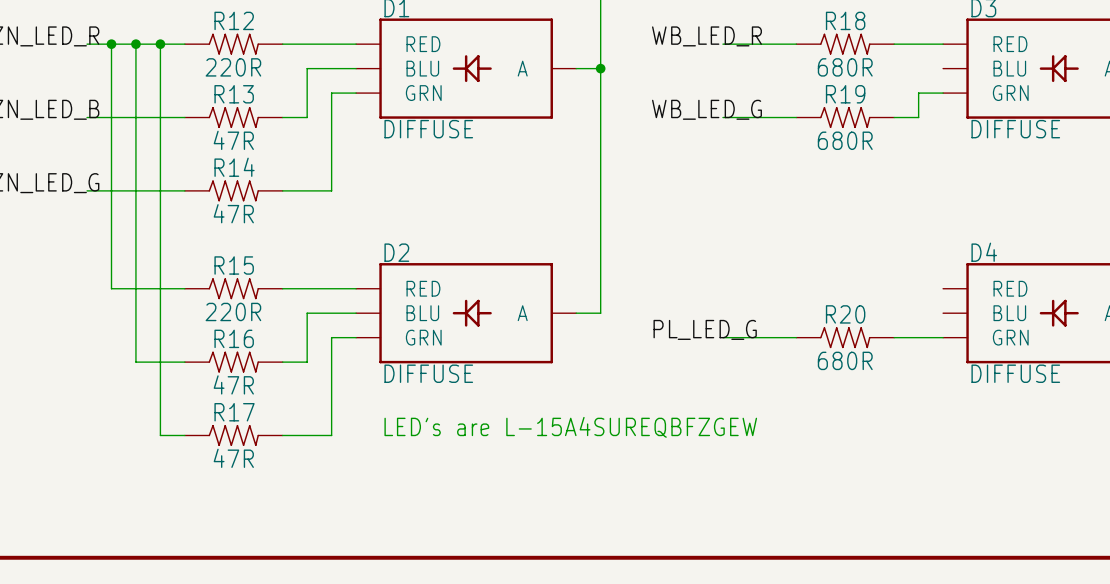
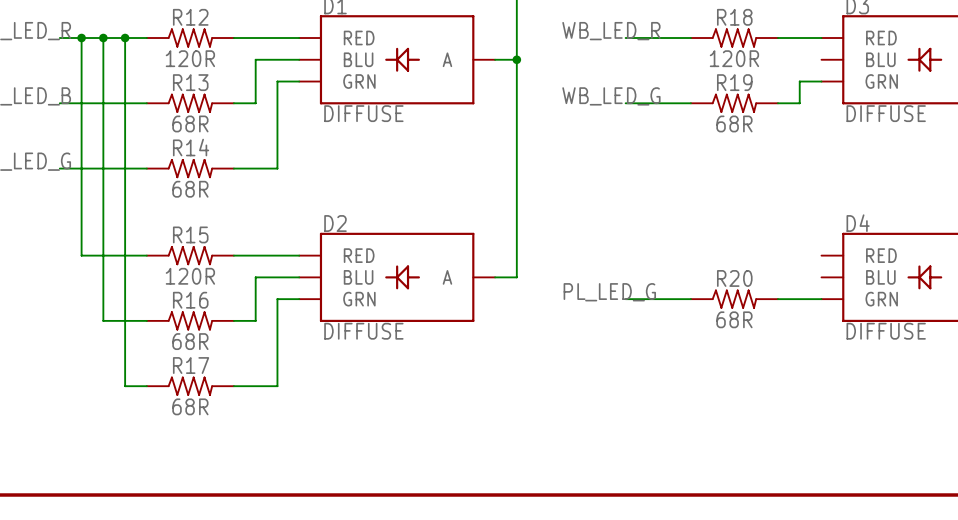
R12 value: 220R (233, 67) -> 120R (190, 58)
R18 value: 680R (845, 67) -> 120R (734, 58)
R13 value: 47R (233, 140) -> 68R (190, 123)
R19 value: 680R (845, 140) -> 68R (734, 123)
R14 value: 47R (233, 213) -> 68R (190, 189)
R15 value: 220R (233, 311) -> 120R (190, 276)
R20 value: 680R (845, 360) -> 68R (734, 319)
R16 value: 47R (233, 384) -> 68R (190, 341)
text: LED's are L-15A4SUREQBFZGEW (570, 427) -> none
R17 value: 47R (233, 458) -> 68R (190, 406)

